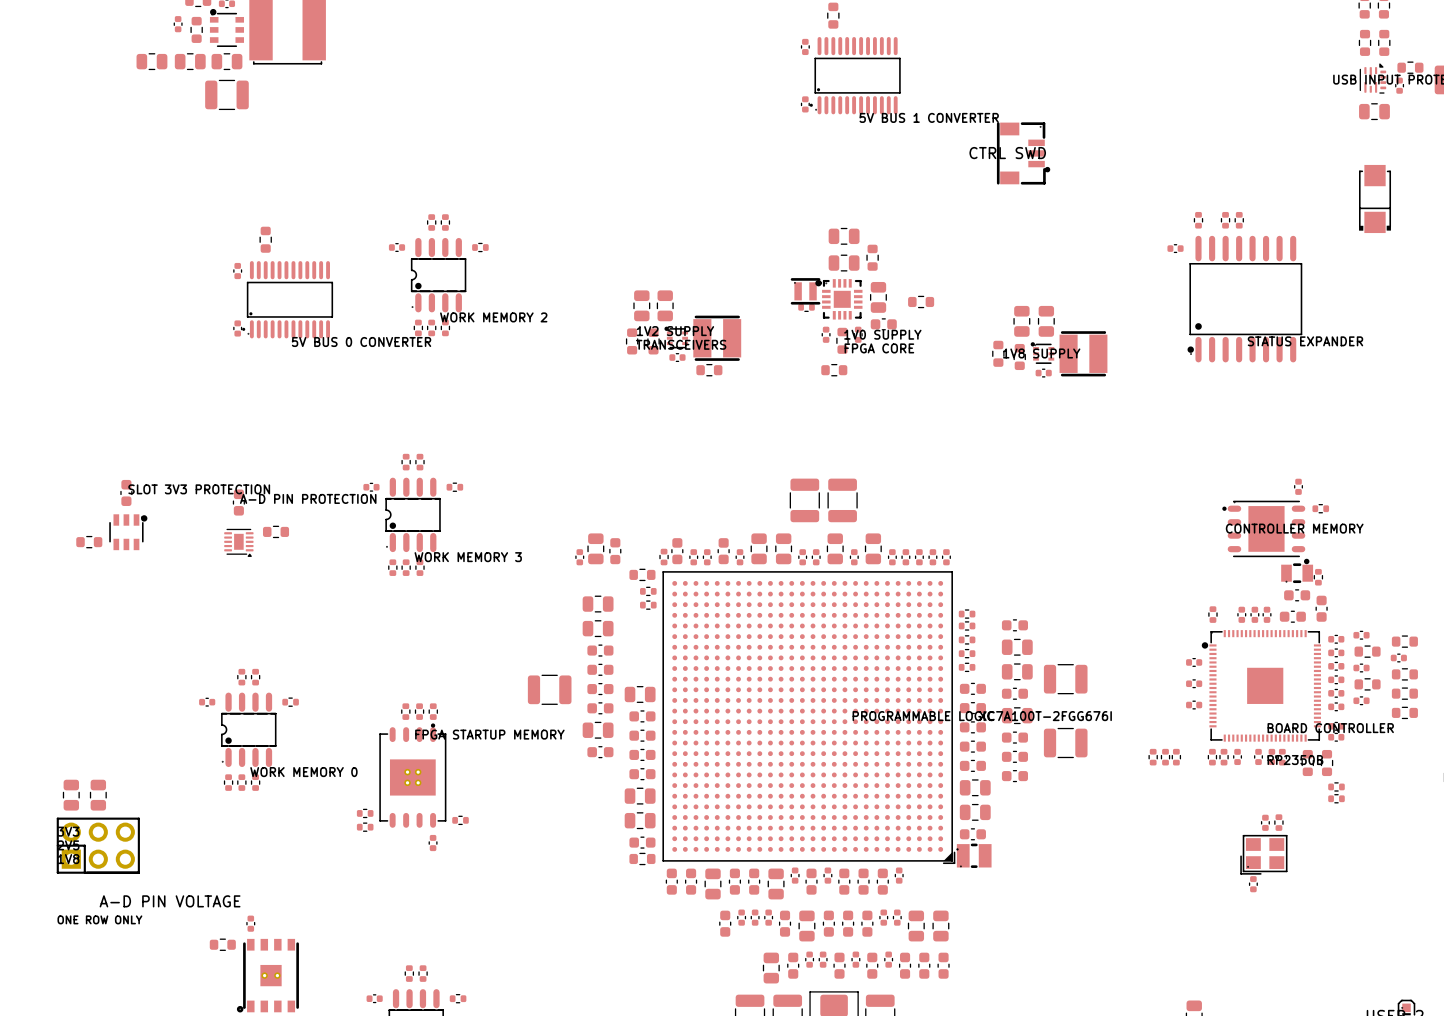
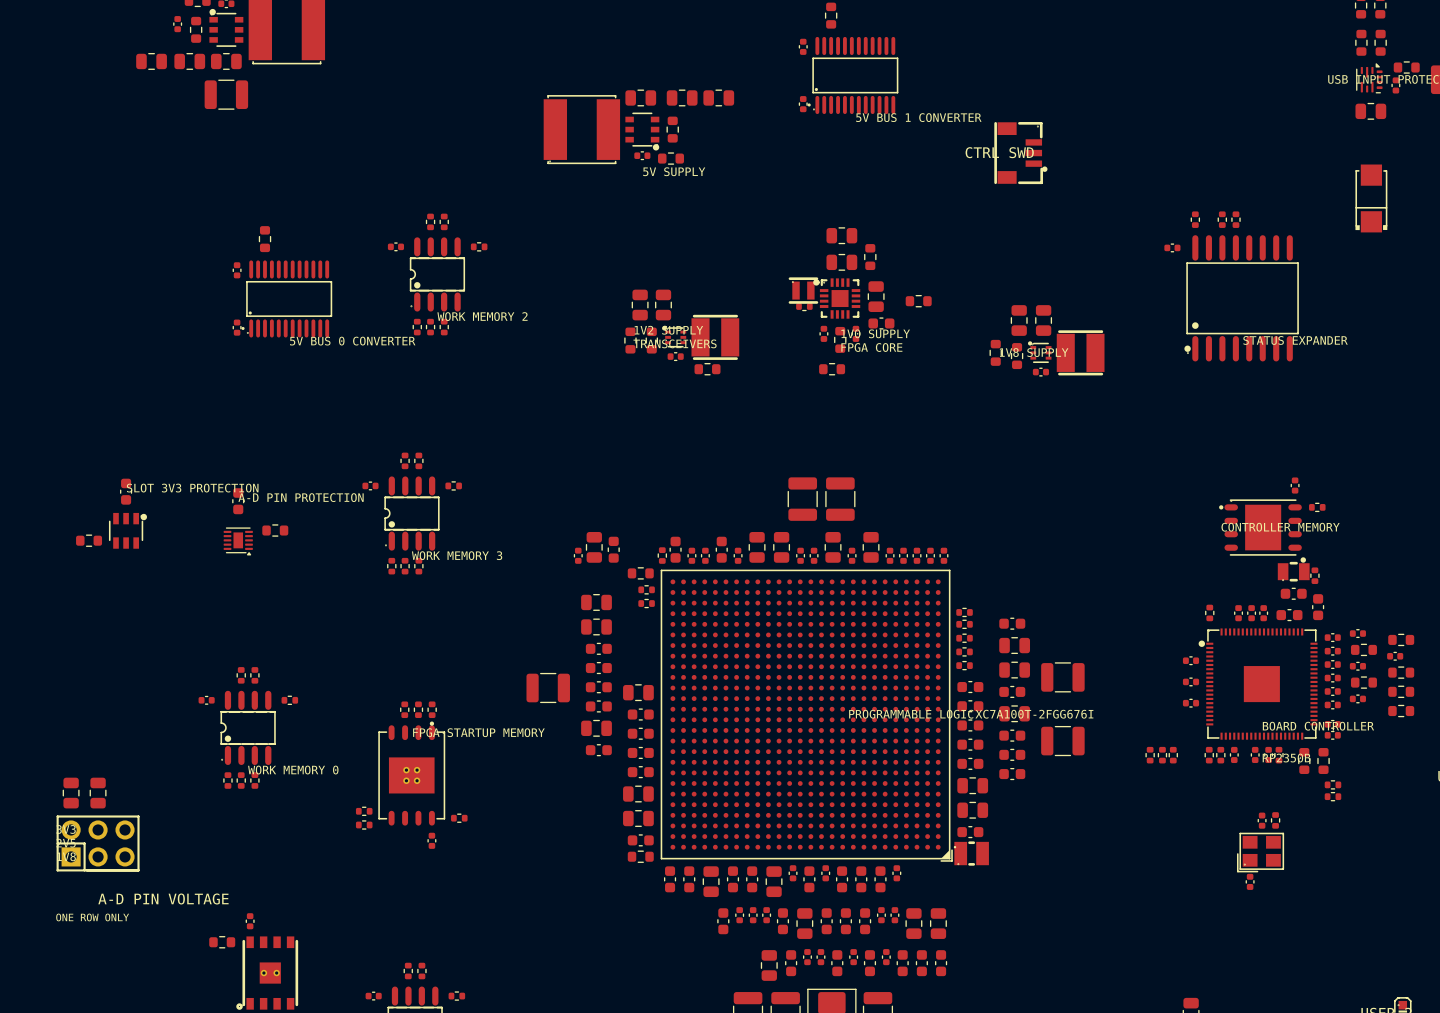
part: none -> (640, 97)
part: none -> (682, 97)
part: none -> (718, 97)
part: none -> (581, 129)
part: none -> (672, 129)
part: none -> (642, 131)
part: none -> (642, 155)
part: none -> (671, 158)

